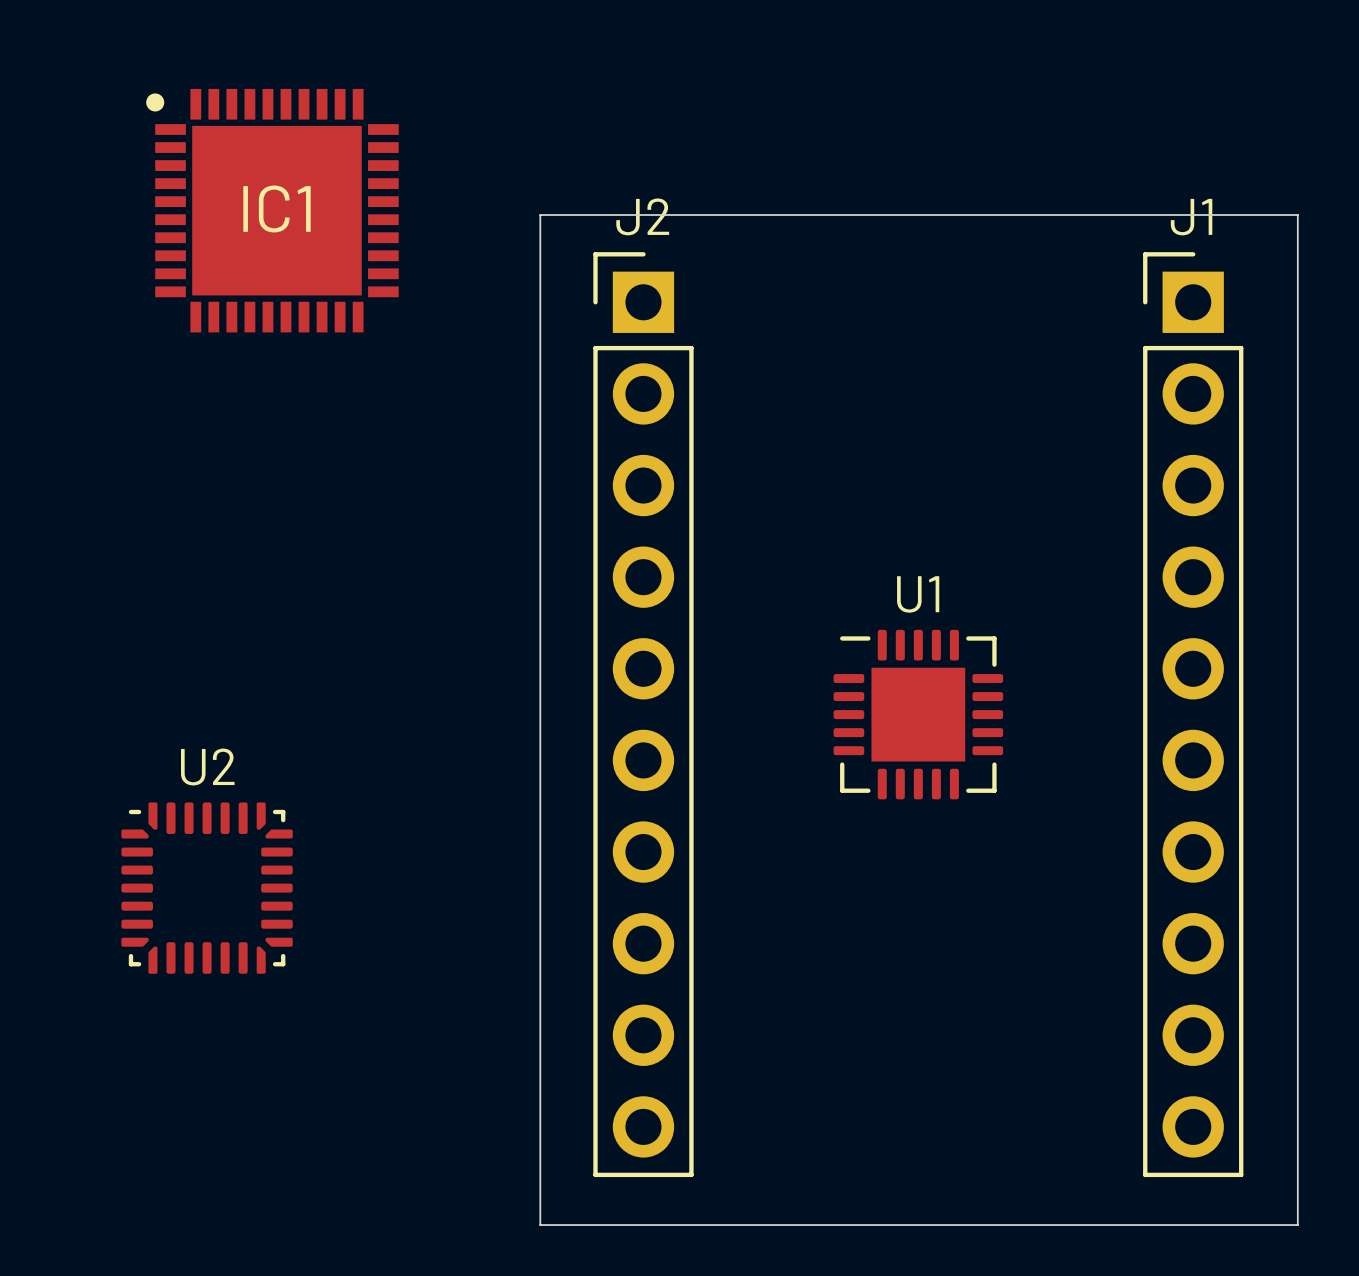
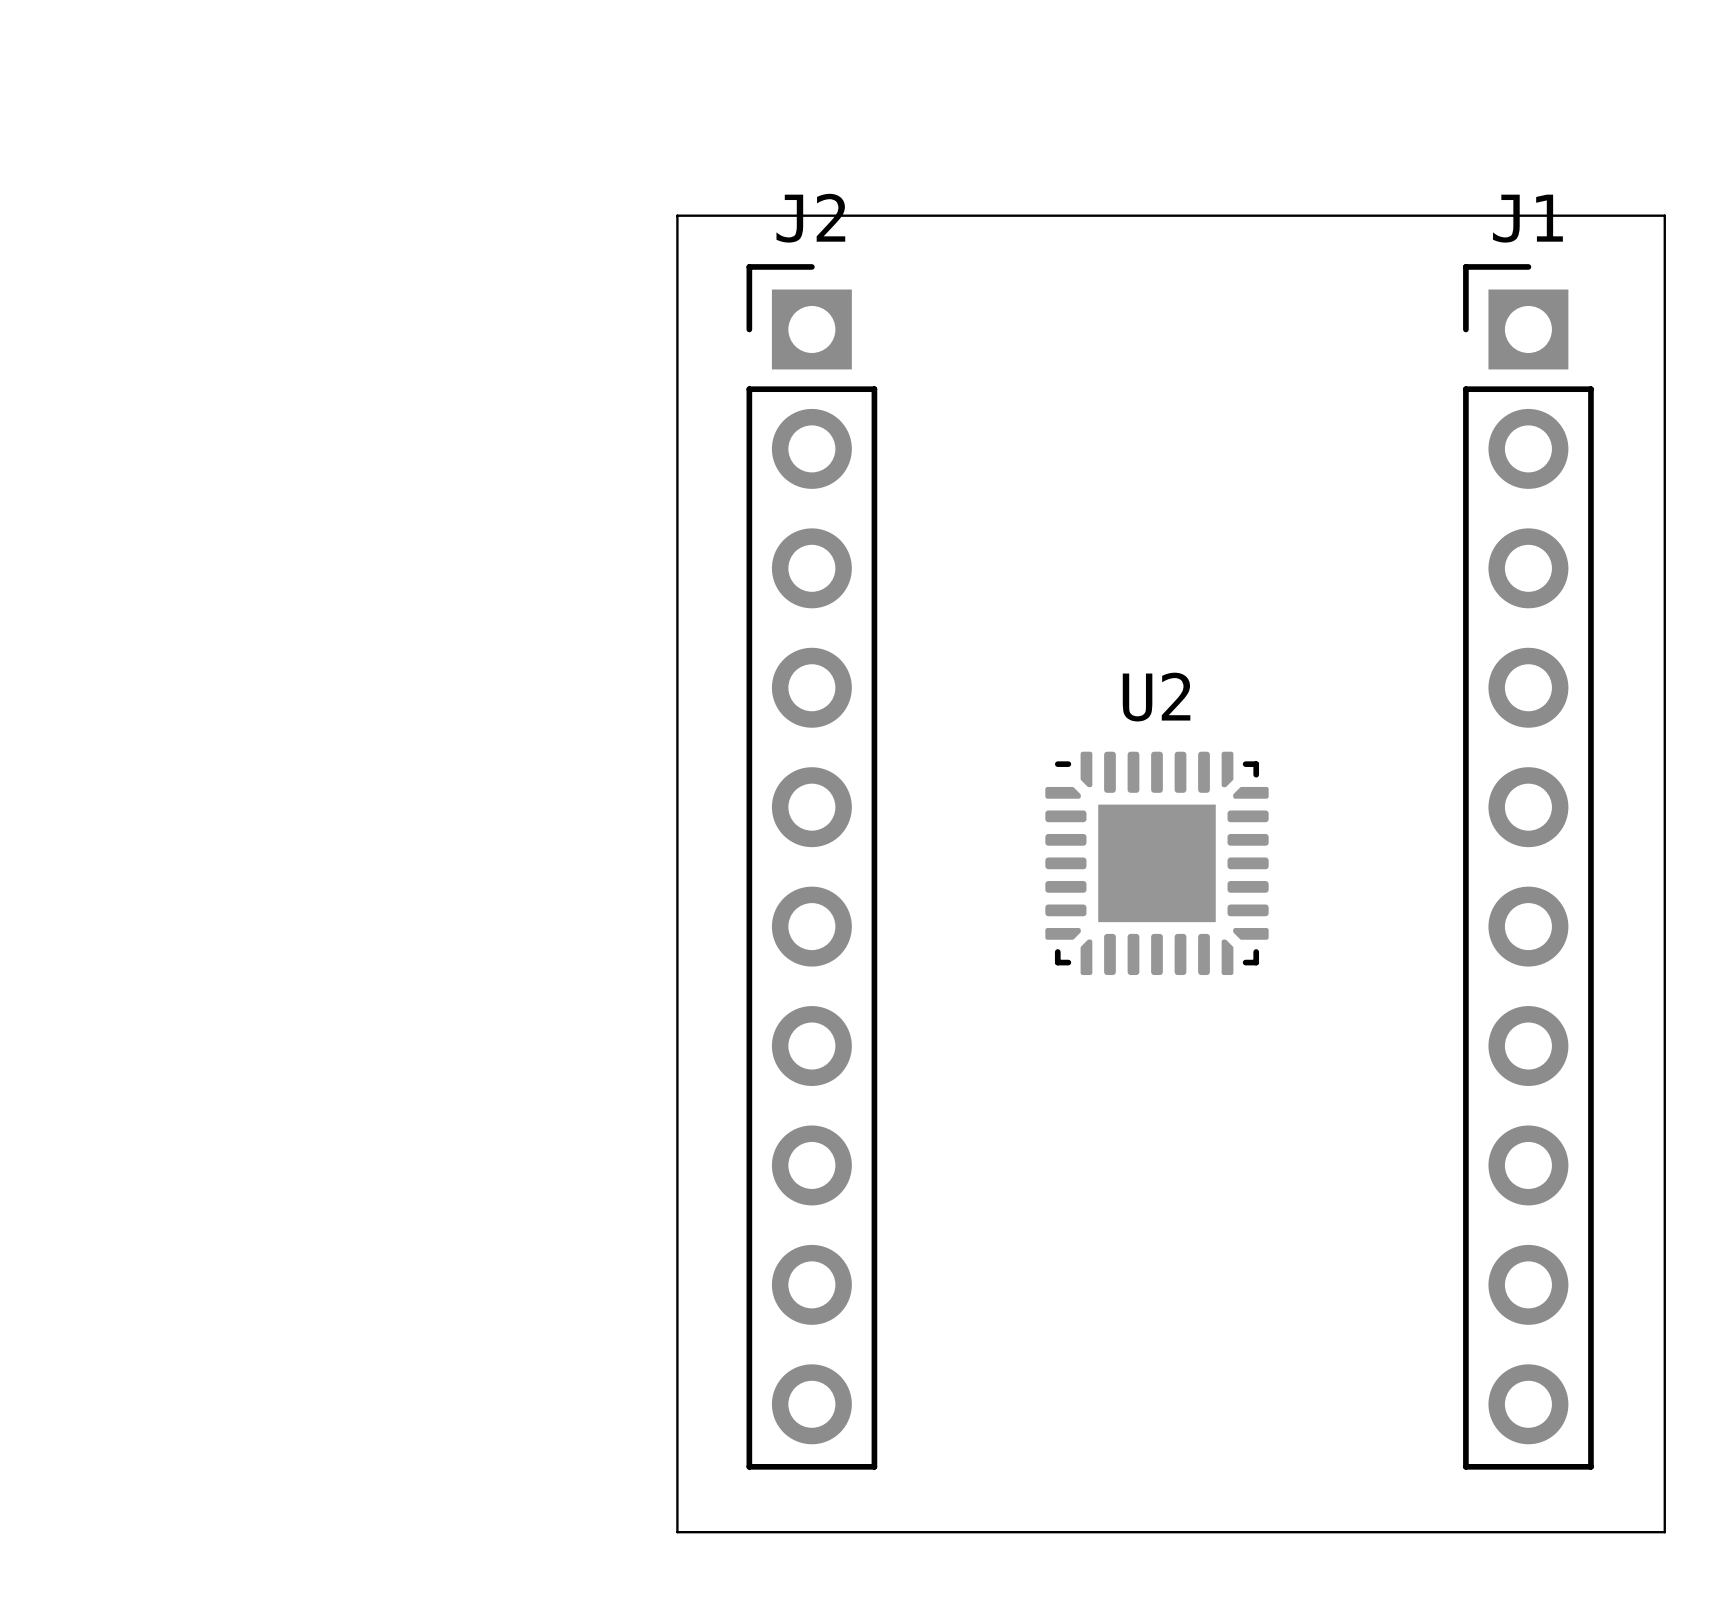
IC1: (272, 210) -> none
U1: (918, 714) -> none
U2 footprint: [121, 802, 293, 974] -> [1045, 751, 1269, 976]

